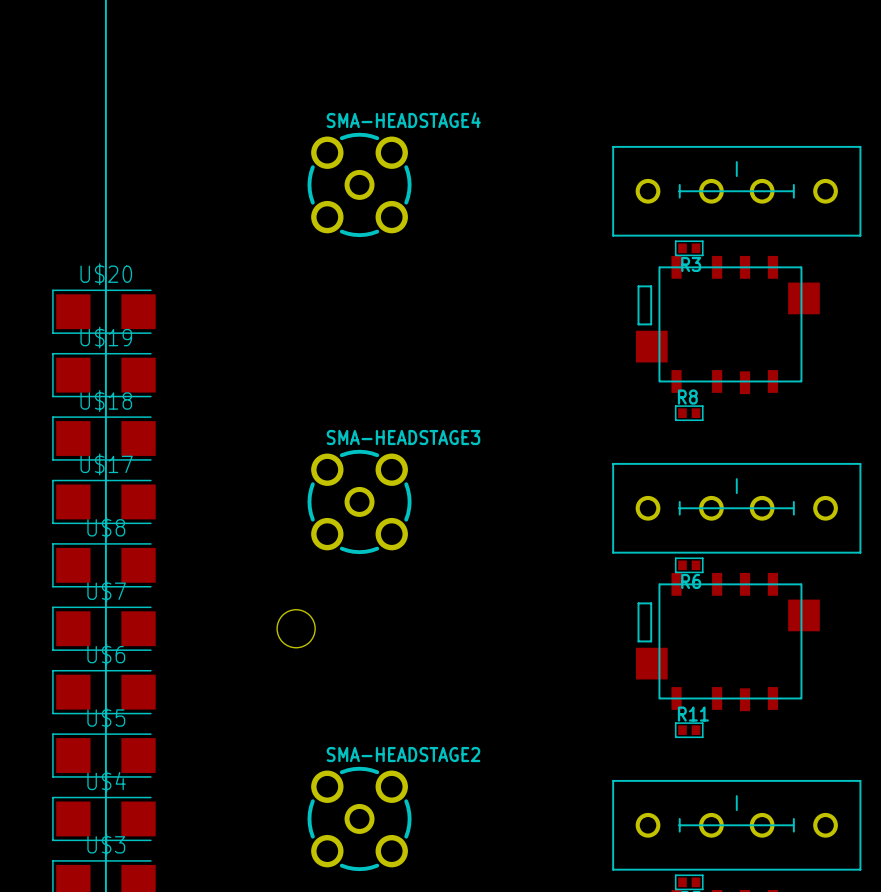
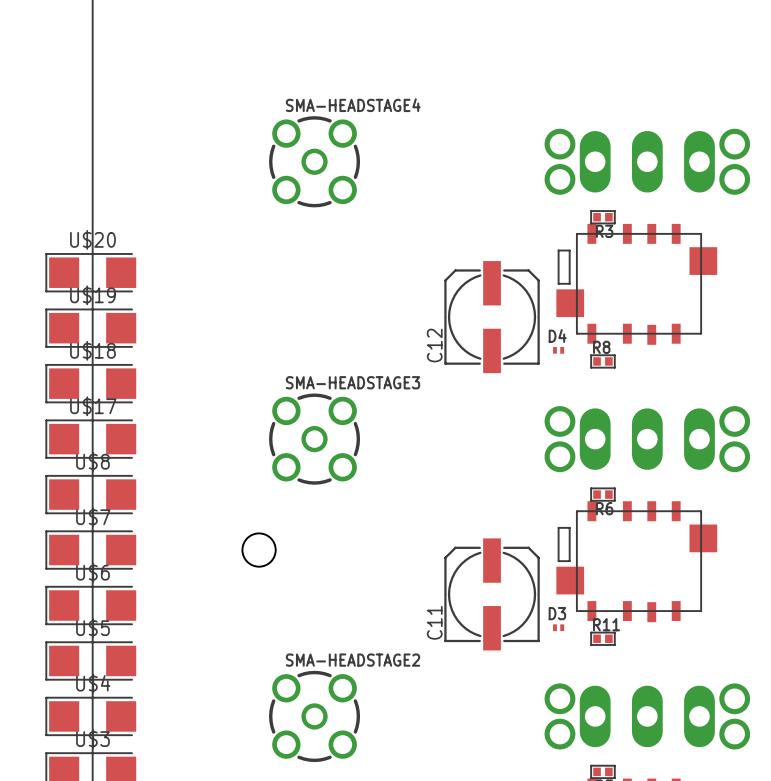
part footprint: [612, 145, 862, 237] -> [544, 128, 751, 195]
C12: none -> (492, 317)
D4: none -> (558, 350)
part footprint: [612, 462, 862, 554] -> [544, 406, 751, 473]
C11: none -> (492, 594)
D3: none -> (558, 627)
part footprint: [612, 779, 862, 871] -> [544, 683, 751, 750]

